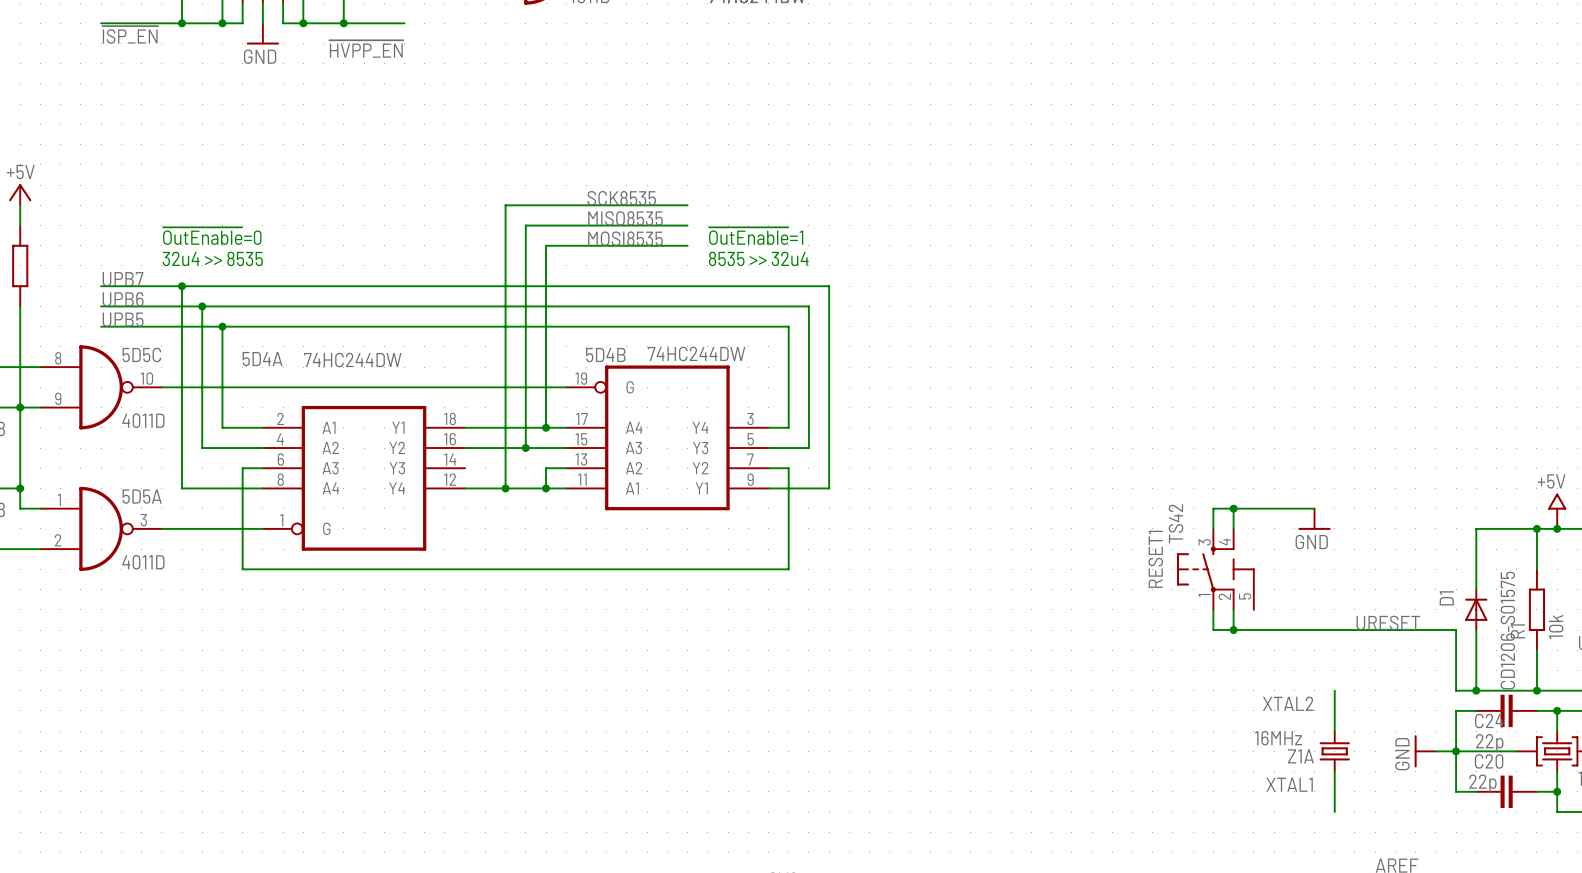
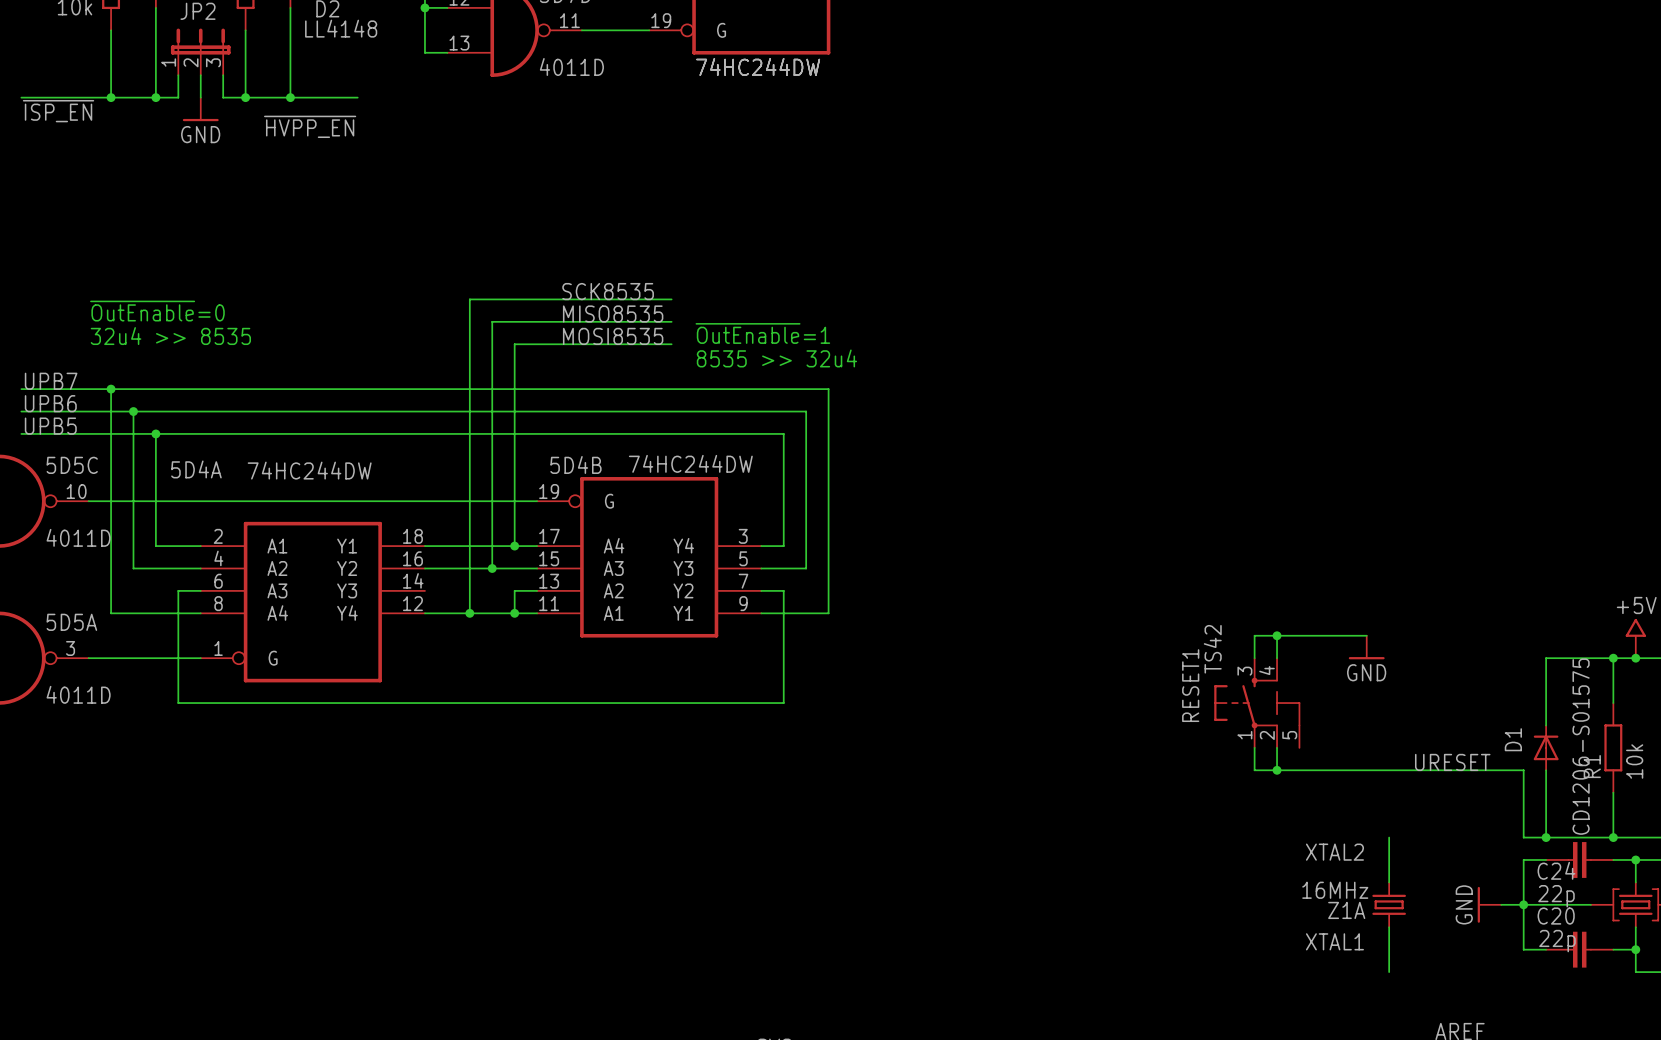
text: none -> ~{OutEnable}=0 (157, 311)
text: ~{OutEnable}=0 (212, 236) -> 32u4 >> 8535 (170, 336)
text: 32u4 >> 8535 (212, 258) -> none

